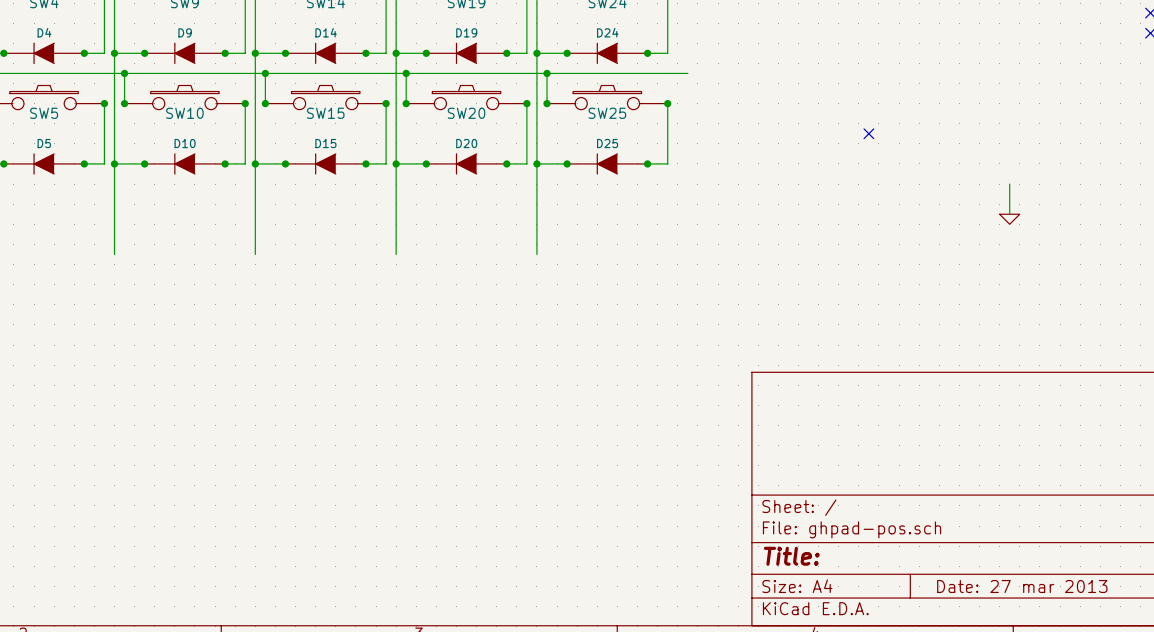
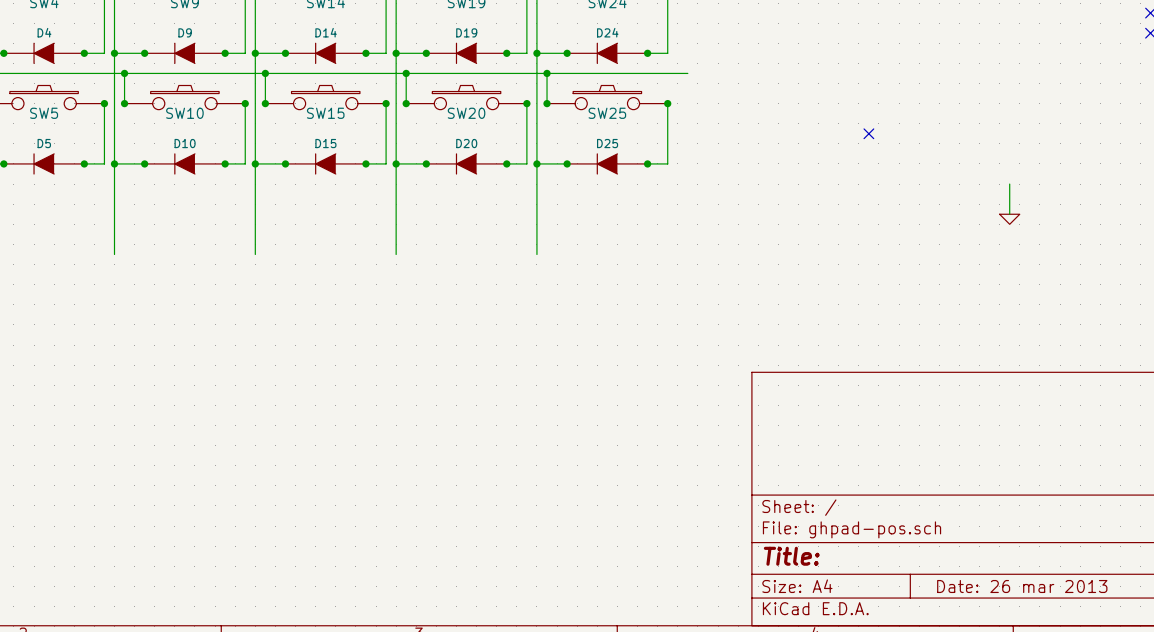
title block: Date: 27 mar 2013 (1022, 586) -> Date: 26 mar 2013 (1022, 586)

